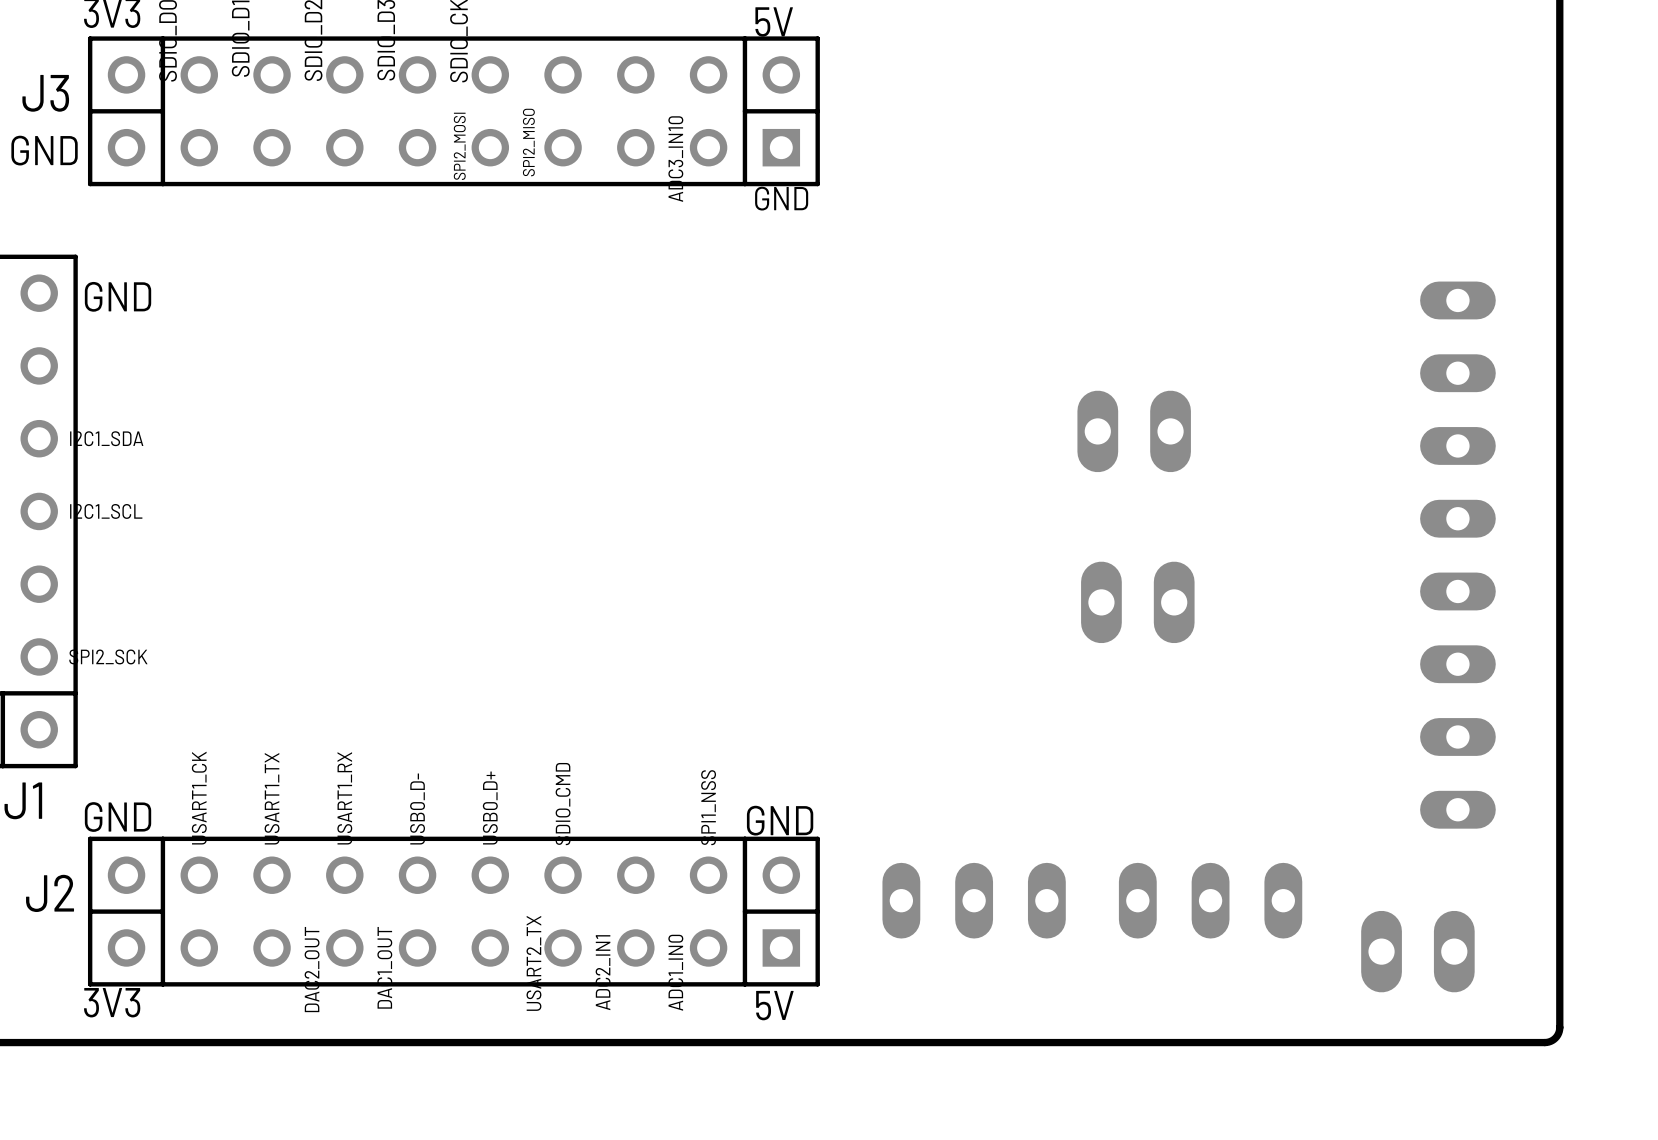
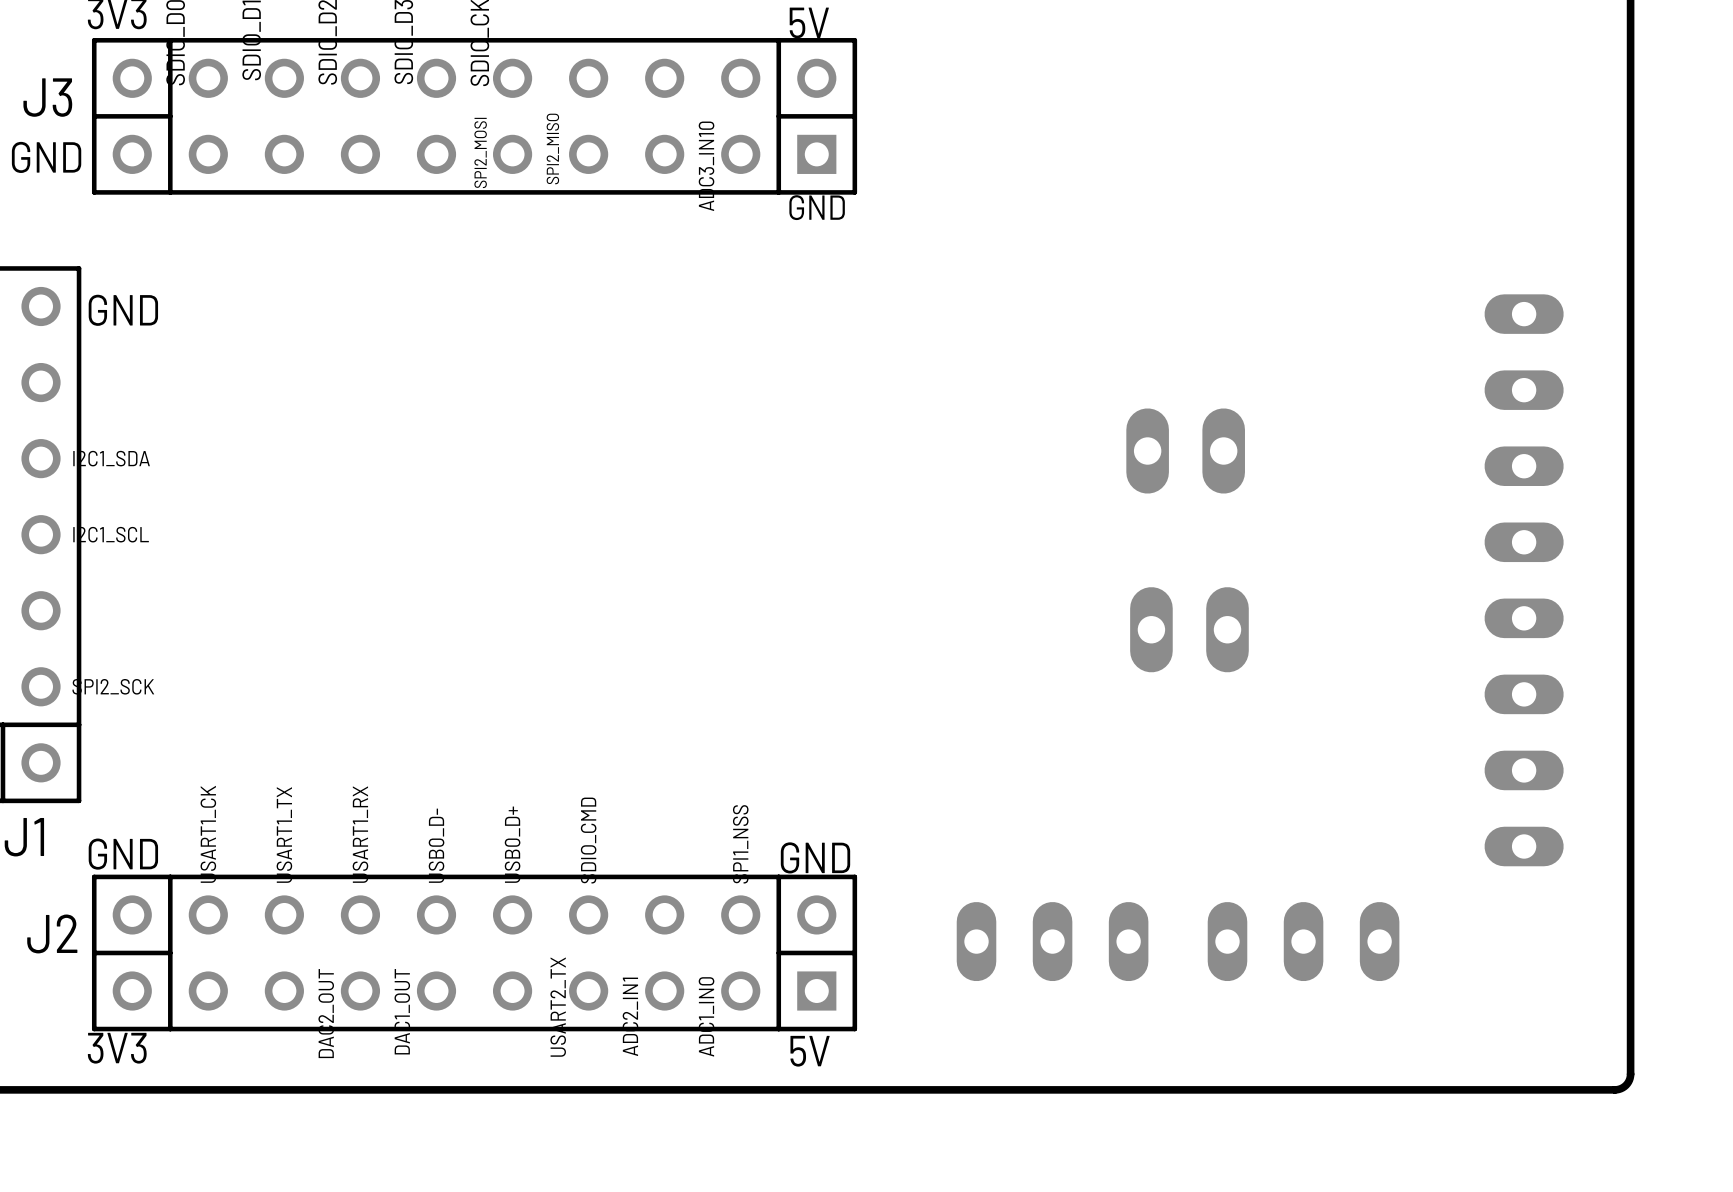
part position: (974, 900) -> (1052, 941)
part position: (1210, 900) -> (1303, 941)
part: (1417, 951) -> none

